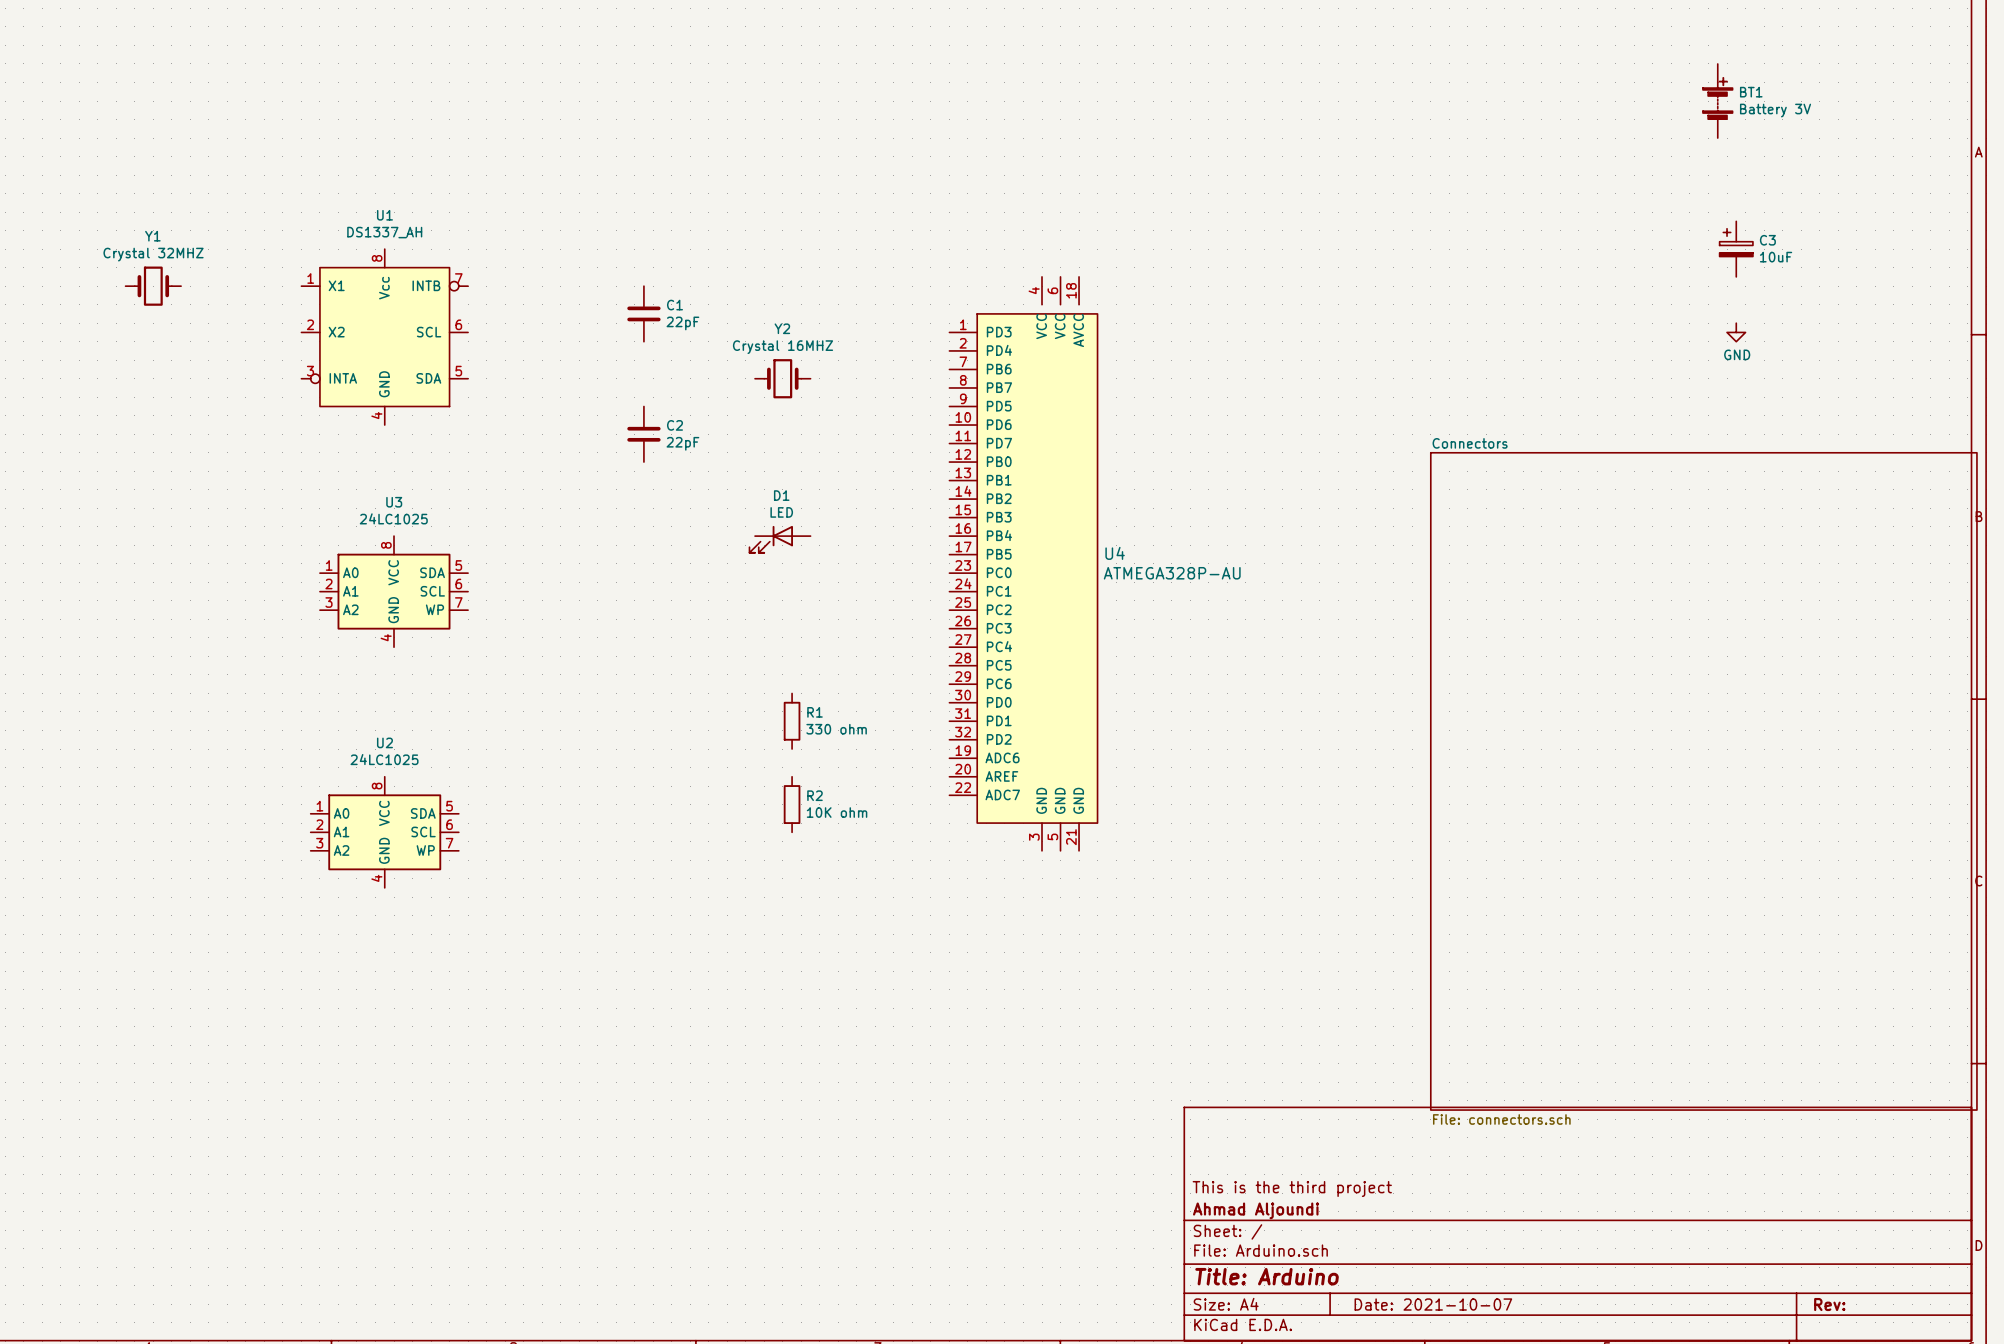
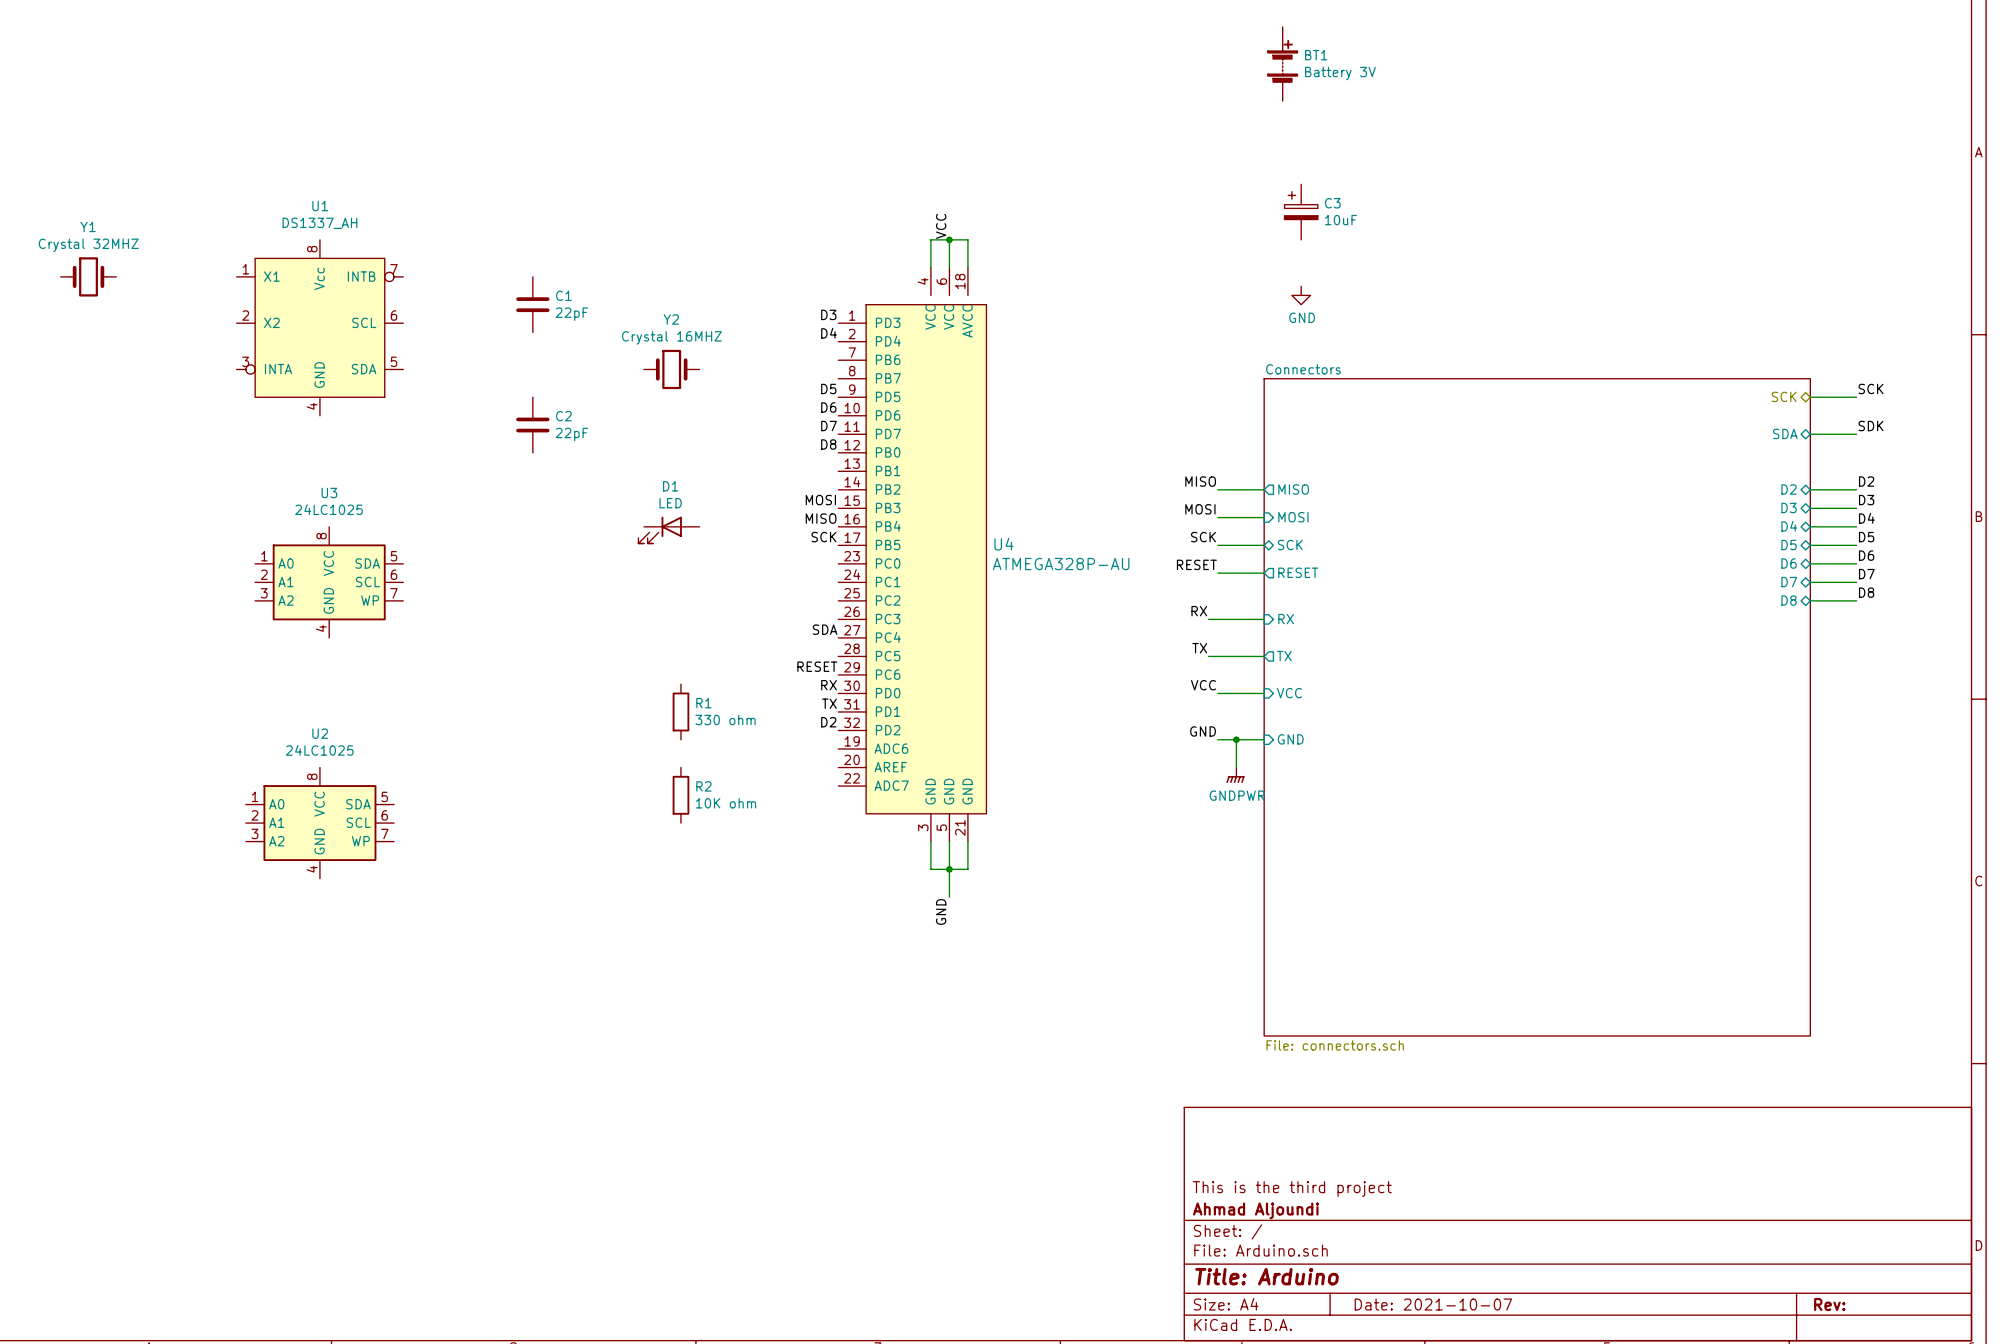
BT1 position: (1717, 101) -> (1282, 63)
label: none -> VCC (941, 226)
wire: none -> (949, 239) (949, 267)
junction: none -> (949, 239)
C3 position: (1736, 249) -> (1301, 212)
wire: none -> (930, 267) (930, 239) (967, 239) (967, 267)
Y1 position: (153, 286) -> (88, 276)
power symbol: none -> GND (1301, 295)
C1 position: (643, 313) -> (532, 304)
label: none -> D3 (828, 314)
power symbol: GND (1736, 332) -> none
label: none -> D4 (829, 333)
U1 position: (384, 337) -> (319, 327)
Y2 position: (782, 378) -> (671, 369)
label: none -> D5 (828, 388)
label: none -> SCK (1871, 388)
hierarchical label: none -> SCK (1784, 396)
wire: none -> (1810, 397) (1856, 397)
label: none -> D6 (828, 407)
label: none -> D7 (829, 426)
label: none -> SDK (1871, 426)
sheet pin: none -> SDA (1785, 433)
C2 position: (643, 434) -> (532, 425)
wire: none -> (1810, 434) (1856, 434)
label: none -> D8 (828, 444)
label: none -> MISO (1200, 481)
label: none -> D2 (1866, 481)
wire: none -> (1217, 489) (1264, 489)
sheet pin: none -> MISO (1293, 489)
sheet pin: none -> D2 (1789, 489)
wire: none -> (1810, 489) (1856, 489)
label: none -> MOSI (820, 500)
label: none -> D3 (1866, 500)
sheet pin: none -> D3 (1789, 507)
wire: none -> (1810, 508) (1856, 508)
label: none -> MOSI (1200, 509)
wire: none -> (1217, 517) (1264, 517)
sheet pin: none -> MOSI (1293, 517)
label: none -> MISO (821, 518)
label: none -> D4 (1866, 518)
sheet pin: none -> D4 (1789, 526)
wire: none -> (1810, 526) (1856, 526)
label: none -> SCK (823, 537)
label: none -> SCK (1203, 537)
label: none -> D5 (1866, 537)
D1 position: (780, 539) -> (668, 530)
wire: none -> (1217, 545) (1264, 545)
sheet pin: none -> SCK (1290, 545)
sheet pin: none -> D5 (1789, 545)
wire: none -> (1810, 545) (1856, 545)
label: none -> D6 (1866, 555)
U4 position: (1023, 563) -> (912, 554)
sheet pin: none -> D6 (1789, 563)
wire: none -> (1810, 563) (1856, 563)
label: none -> RESET (1196, 564)
sheet pin: none -> RESET (1298, 572)
wire: none -> (1217, 573) (1264, 573)
label: none -> D7 (1866, 574)
sheet pin: none -> D7 (1789, 582)
wire: none -> (1810, 582) (1856, 582)
U3 position: (394, 591) -> (329, 582)
label: none -> D8 (1866, 592)
sheet pin: none -> D8 (1789, 600)
wire: none -> (1810, 600) (1856, 600)
label: none -> RX (1199, 611)
wire: none -> (1208, 619) (1264, 619)
sheet pin: none -> RX (1286, 619)
label: none -> SDA (825, 629)
label: none -> TX (1199, 648)
wire: none -> (1208, 656) (1264, 656)
sheet pin: none -> TX (1284, 656)
label: none -> RESET (817, 666)
label: none -> RX (829, 685)
label: none -> VCC (1203, 685)
wire: none -> (1217, 693) (1264, 693)
sheet pin: none -> VCC (1289, 693)
label: none -> TX (829, 703)
sheet Connectors: none -> File: connectors.sch (1537, 707)
R1 position: (792, 721) -> (680, 711)
label: none -> D2 (828, 722)
label: none -> GND (1203, 731)
wire: none -> (1217, 739) (1264, 739)
wire: none -> (1236, 739) (1236, 767)
junction: none -> (1236, 739)
sheet pin: none -> GND (1290, 739)
power symbol: none -> GNDPWR (1235, 775)
sheet Connectors: File: connectors.sch (1703, 781) -> none
R2 position: (792, 804) -> (680, 795)
U2 position: (384, 832) -> (319, 823)
wire: none -> (930, 841) (930, 869) (967, 869) (967, 841)
wire: none -> (949, 841) (949, 897)
junction: none -> (949, 869)
label: none -> GND (941, 911)

